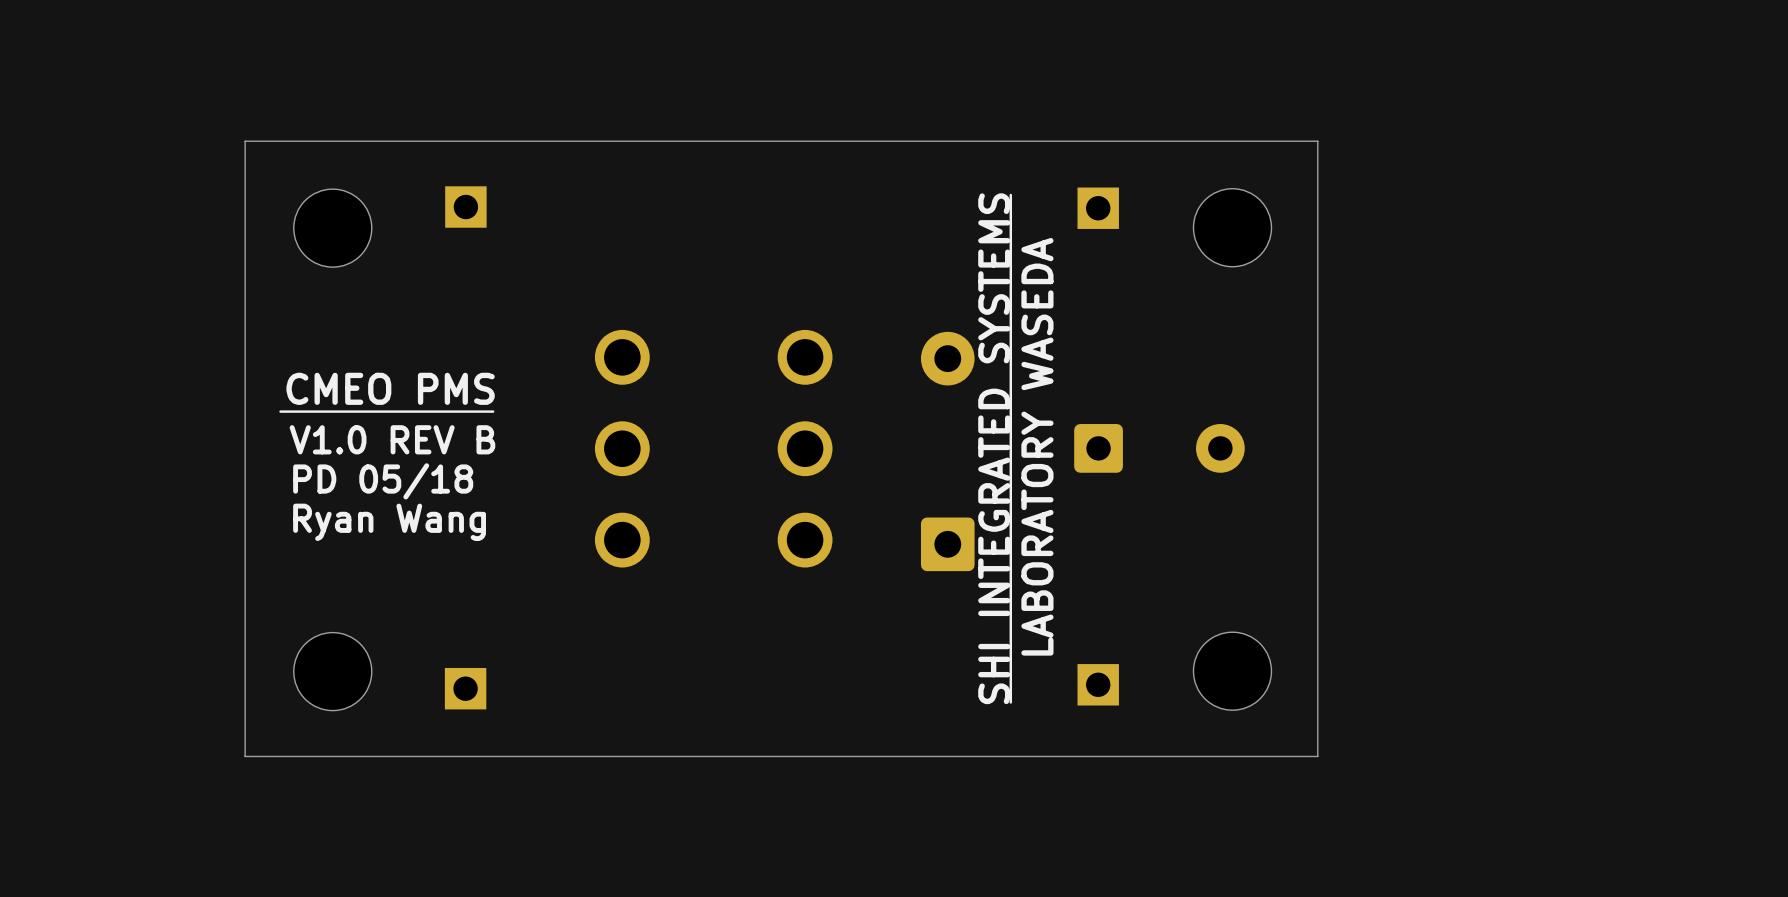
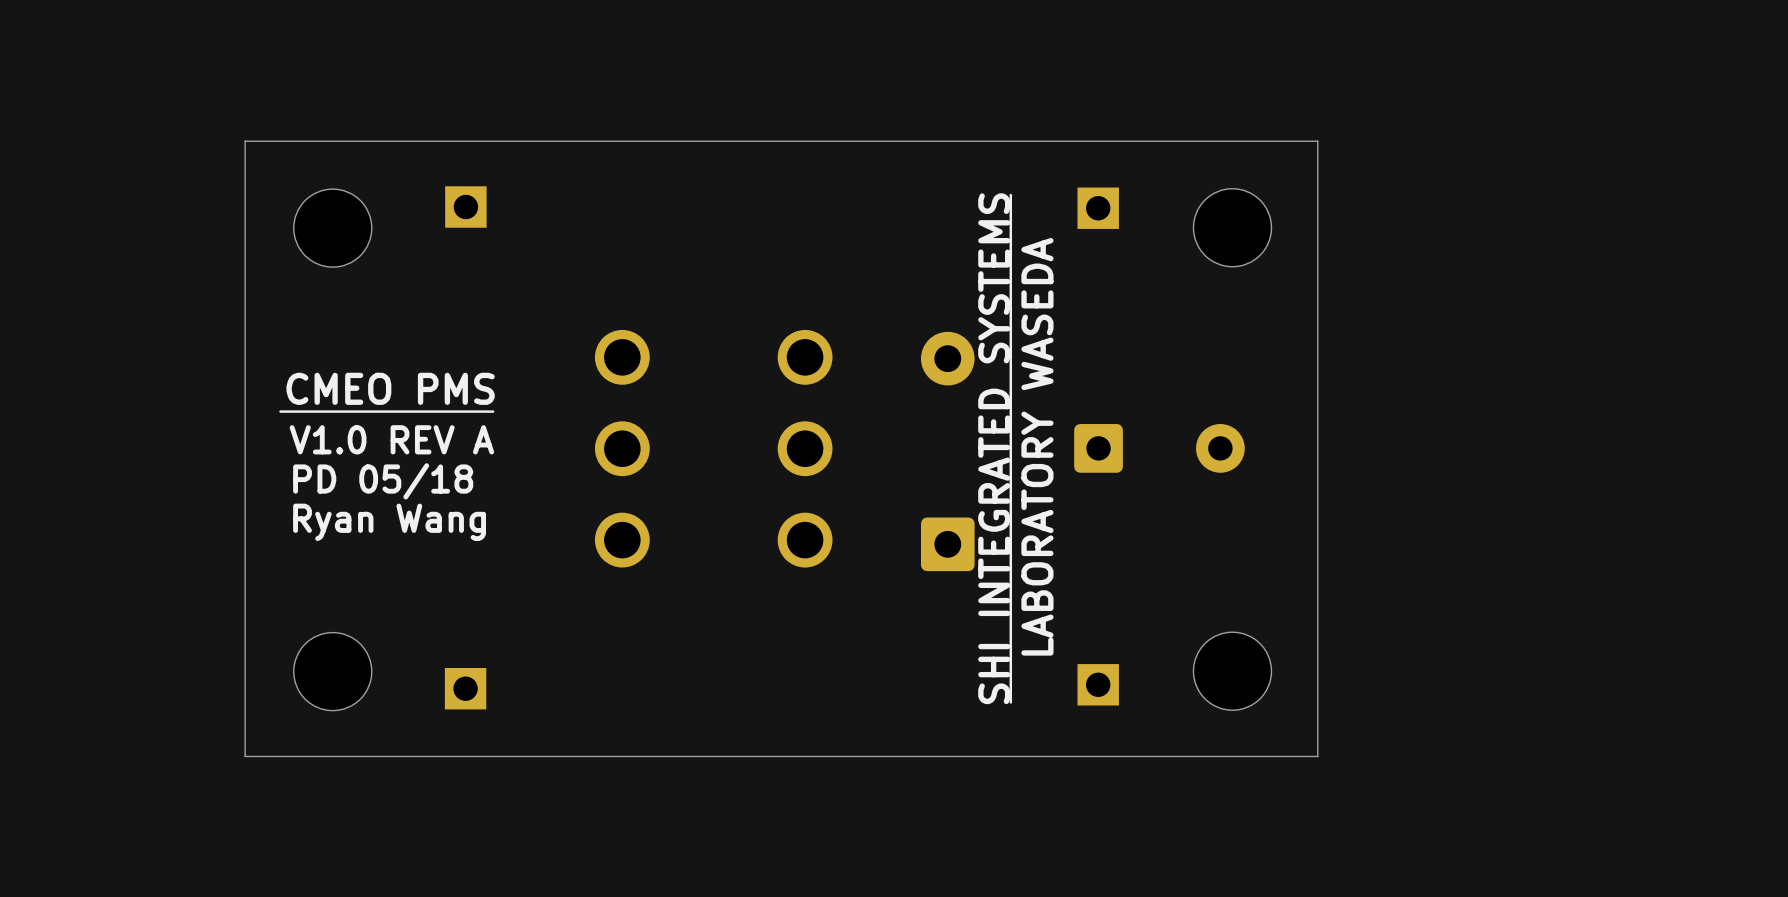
text: V1.0 REV B (392, 439) -> V1.0 REV A (391, 439)

